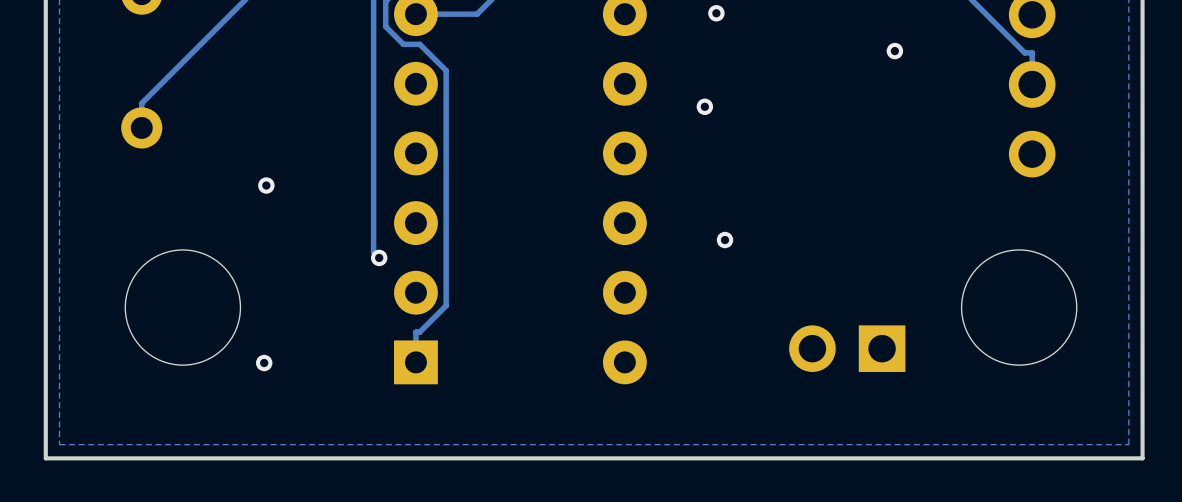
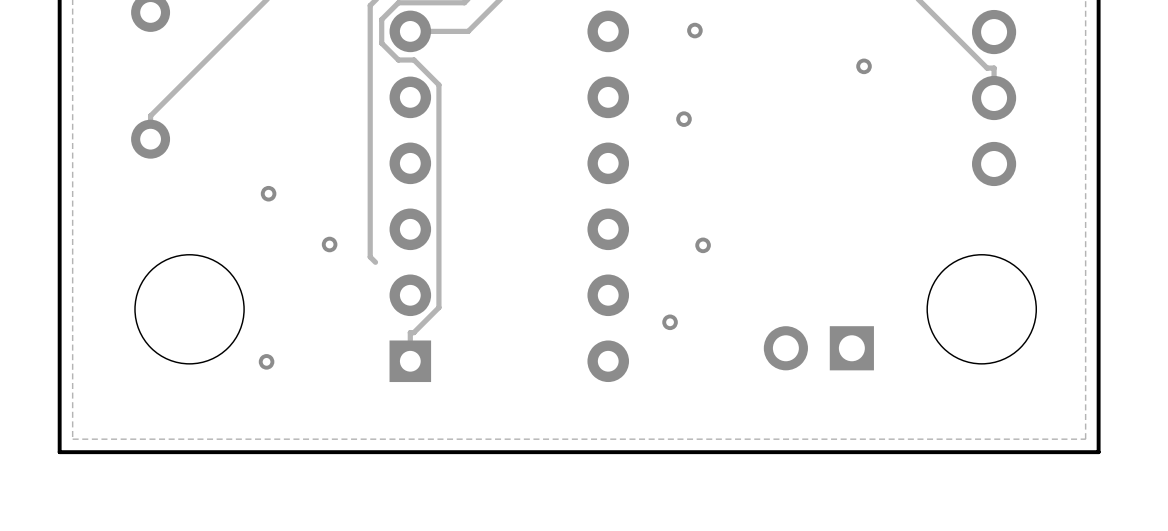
via position: (379, 257) -> (329, 244)
via: none -> (670, 322)

